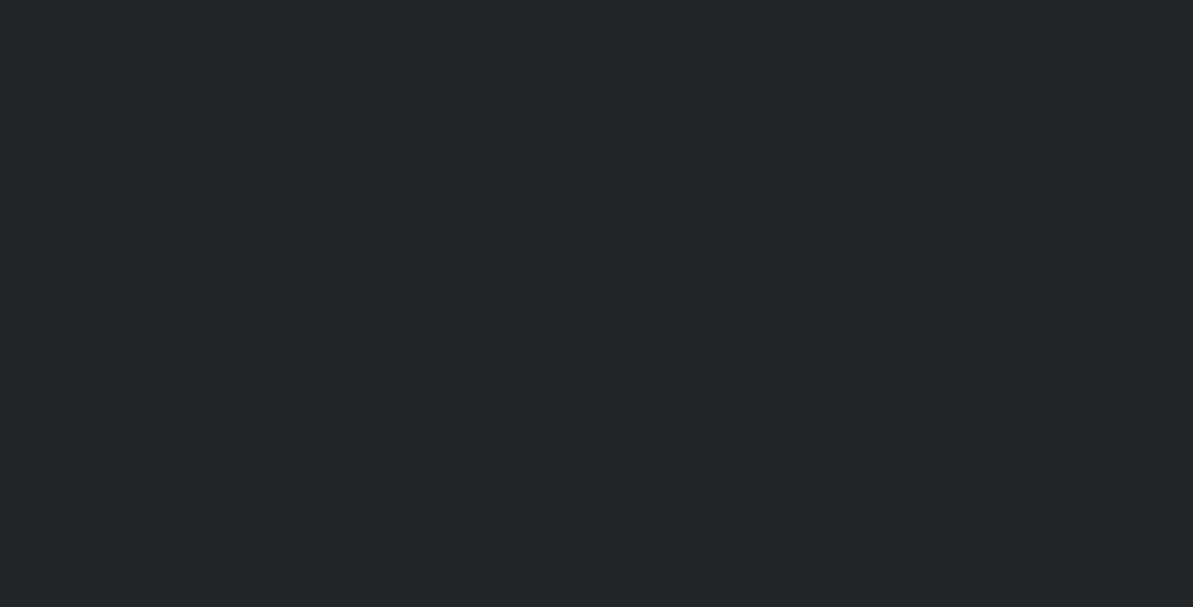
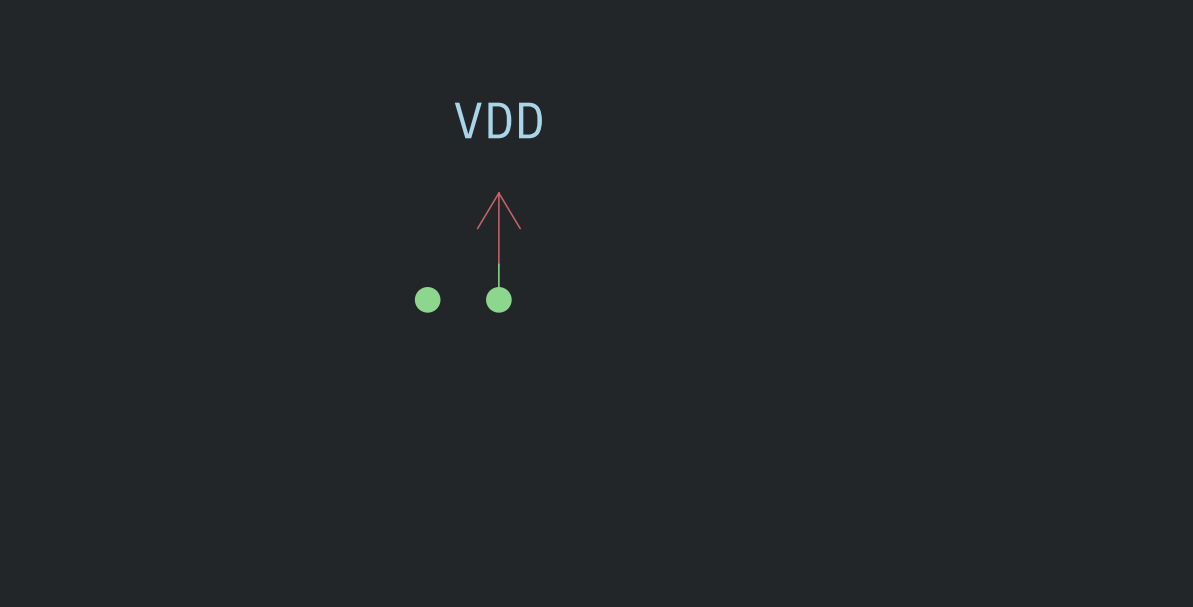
power symbol: none -> VDD (498, 228)
wire: none -> (498, 264) (498, 299)
junction: none -> (427, 299)
junction: none -> (498, 299)

